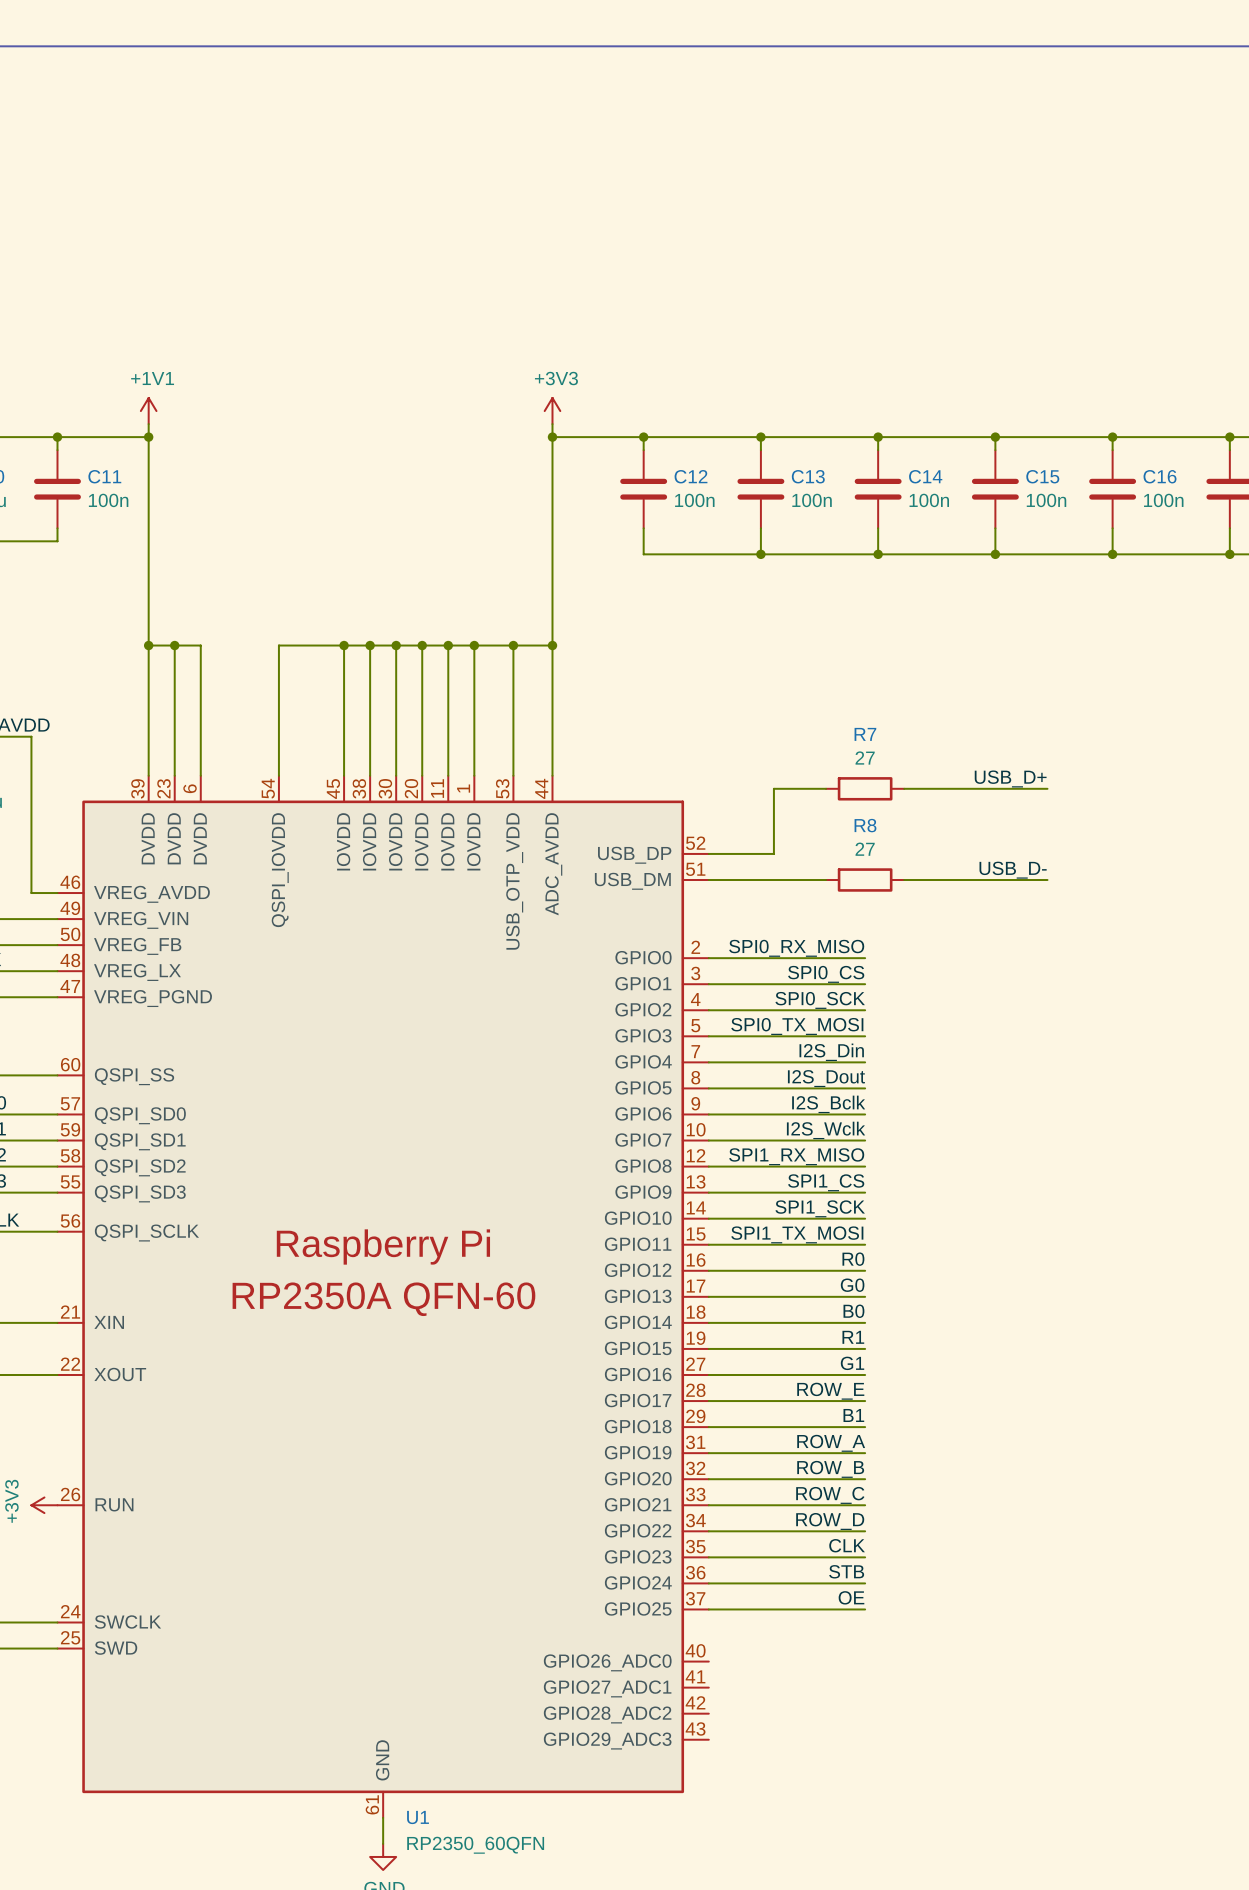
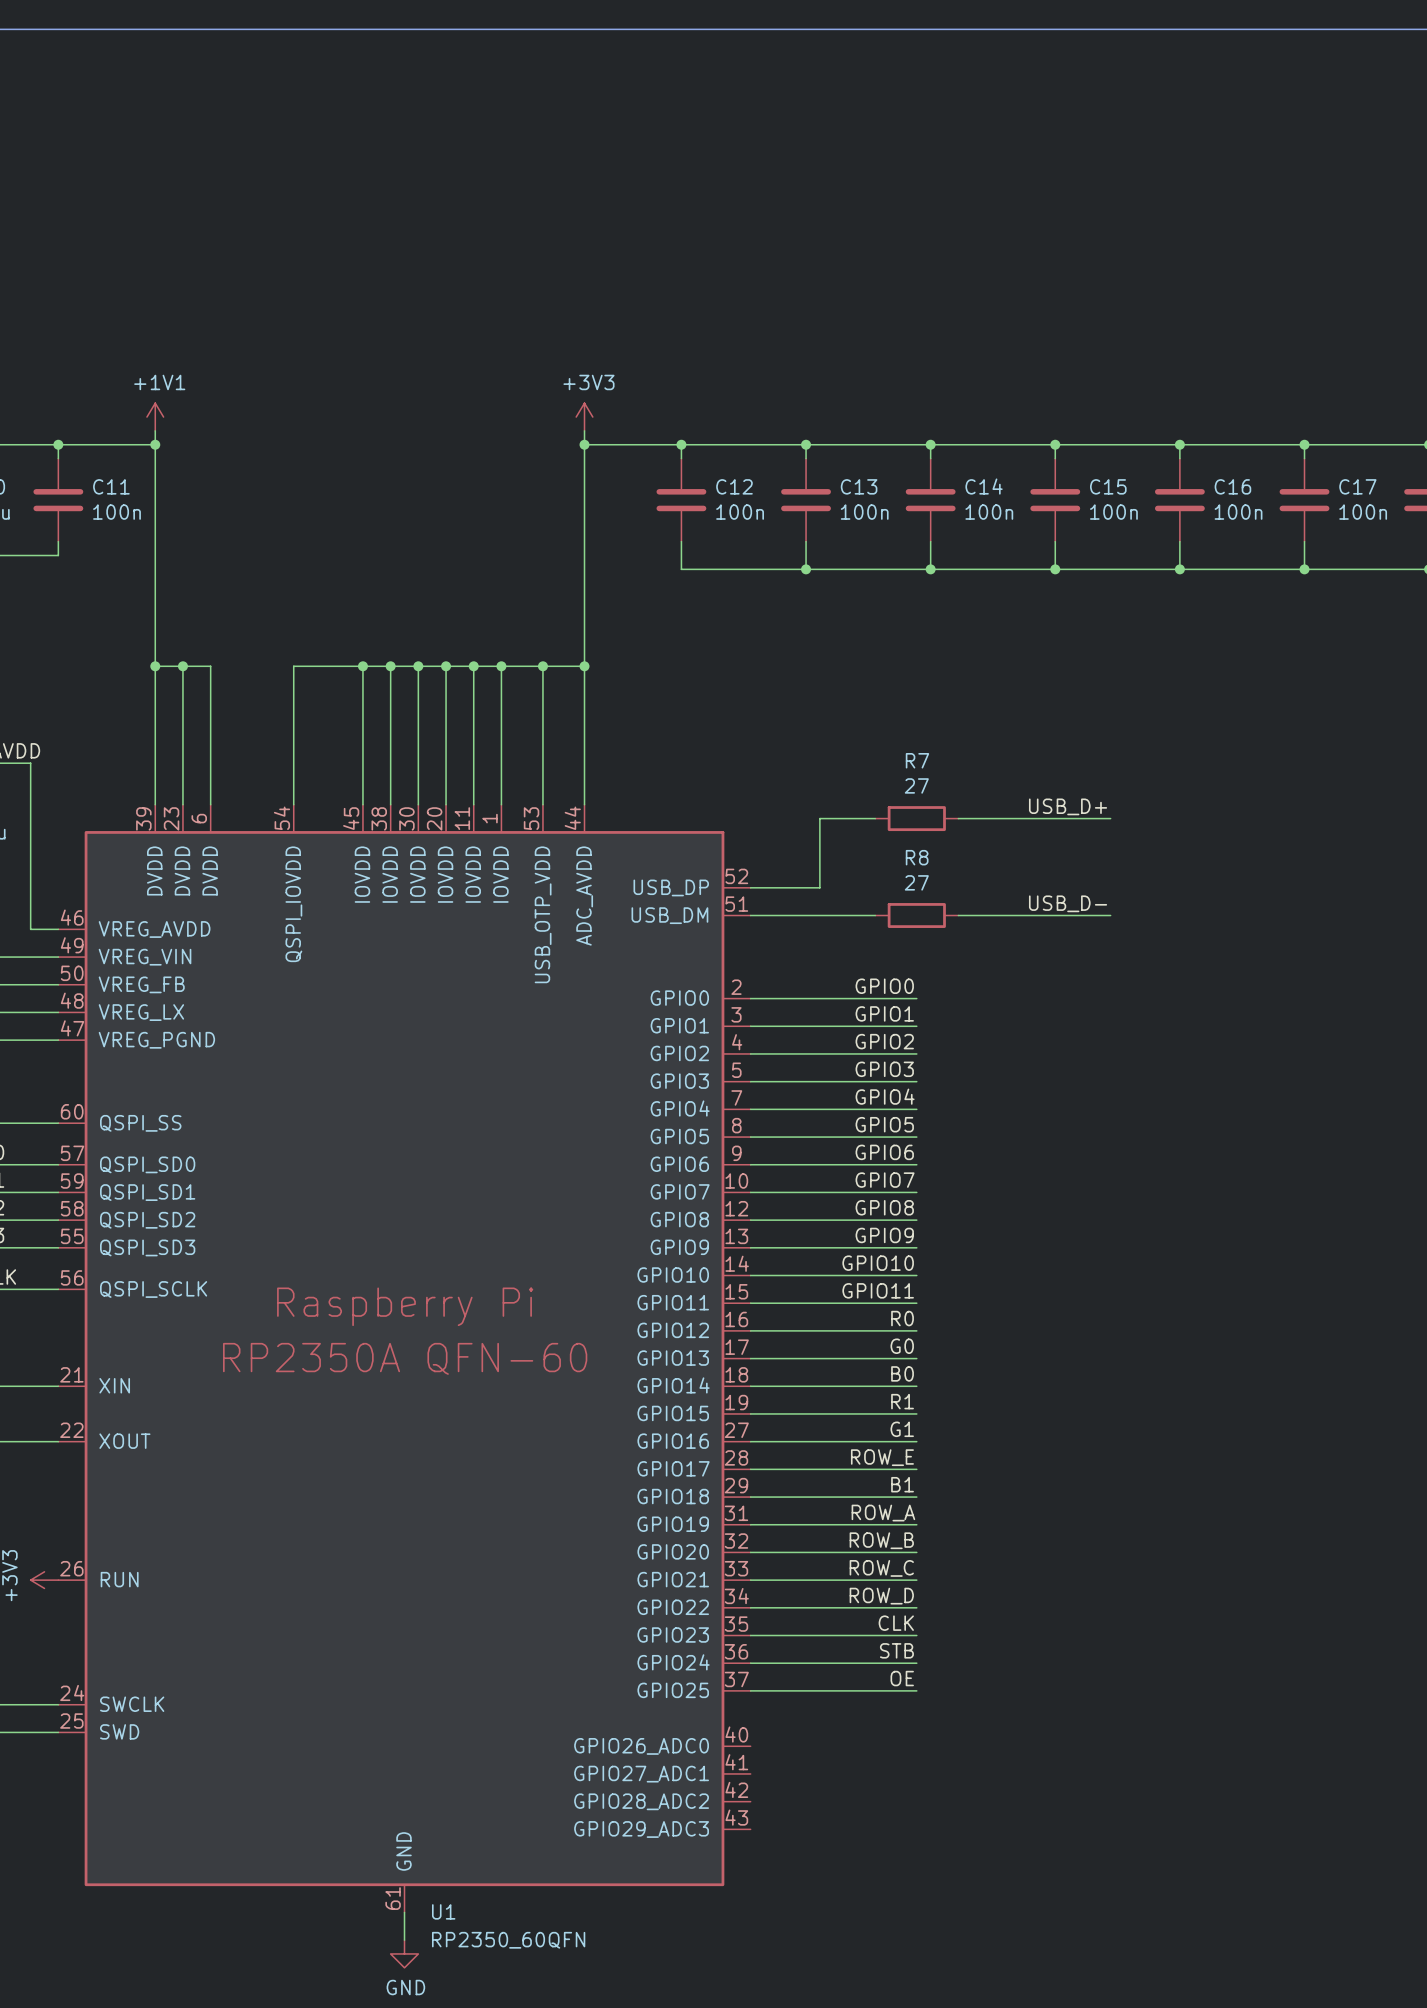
label: SPI0_RX_MISO (796, 948) -> GPIO0 (884, 986)
label: SPI0_CS (826, 974) -> GPIO1 (884, 1013)
label: SPI0_SCK (820, 1000) -> GPIO2 (884, 1041)
label: SPI0_TX_MOSI (797, 1026) -> GPIO3 (884, 1069)
label: I2S_Din (831, 1052) -> GPIO4 (885, 1096)
label: I2S_Dout (826, 1078) -> GPIO5 (884, 1124)
label: I2S_Bclk (828, 1104) -> GPIO6 (884, 1152)
label: I2S_Wclk (826, 1130) -> GPIO7 (885, 1180)
label: SPI1_RX_MISO (796, 1156) -> GPIO8 (884, 1207)
label: SPI1_CS (826, 1182) -> GPIO9 (884, 1235)
label: SPI1_SCK (820, 1208) -> GPIO10 (878, 1263)
label: SPI1_TX_MOSI (797, 1234) -> GPIO11 (878, 1290)

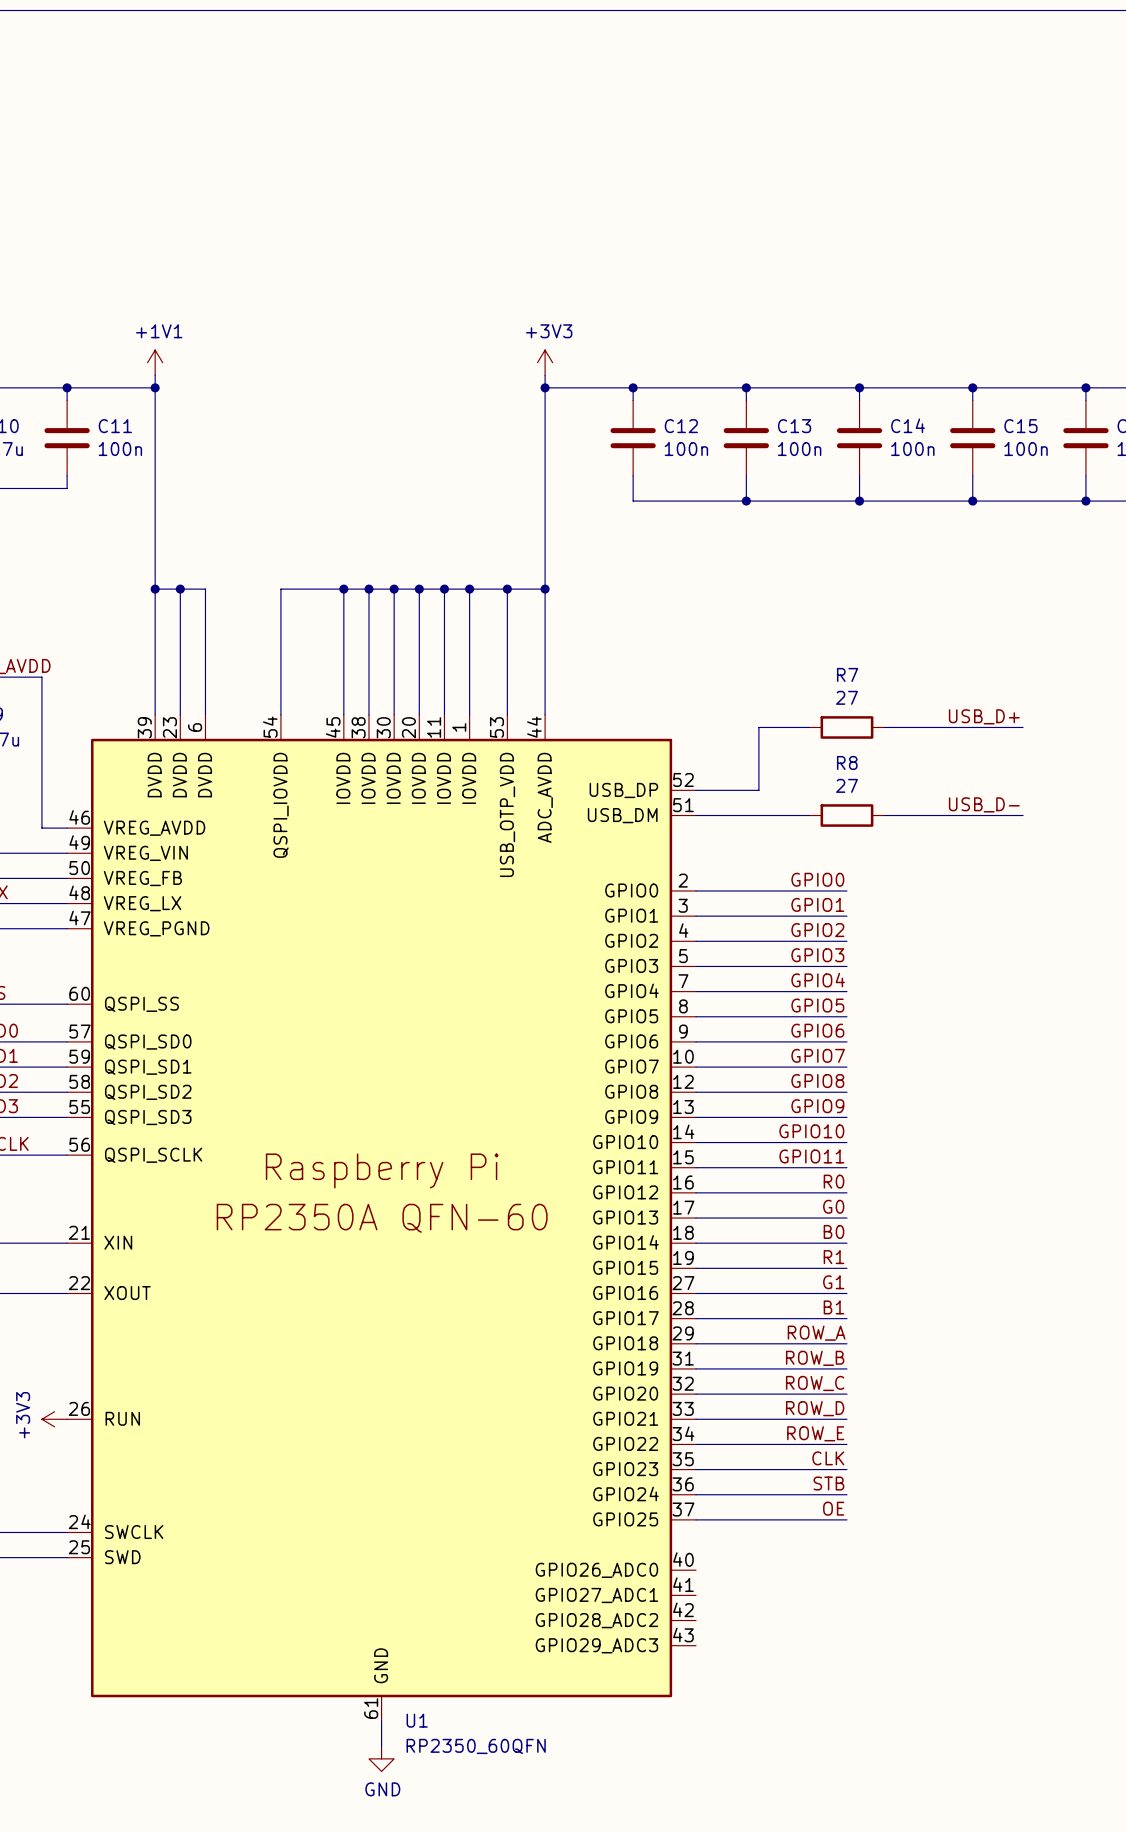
label: ROW_E (882, 1457) -> B1 (834, 1307)
label: B1 (902, 1484) -> ROW_A (816, 1333)
label: ROW_A (883, 1513) -> ROW_B (815, 1358)
label: ROW_B (881, 1540) -> ROW_C (815, 1383)
label: ROW_C (881, 1568) -> ROW_D (815, 1408)
label: ROW_D (881, 1596) -> ROW_E (815, 1433)

